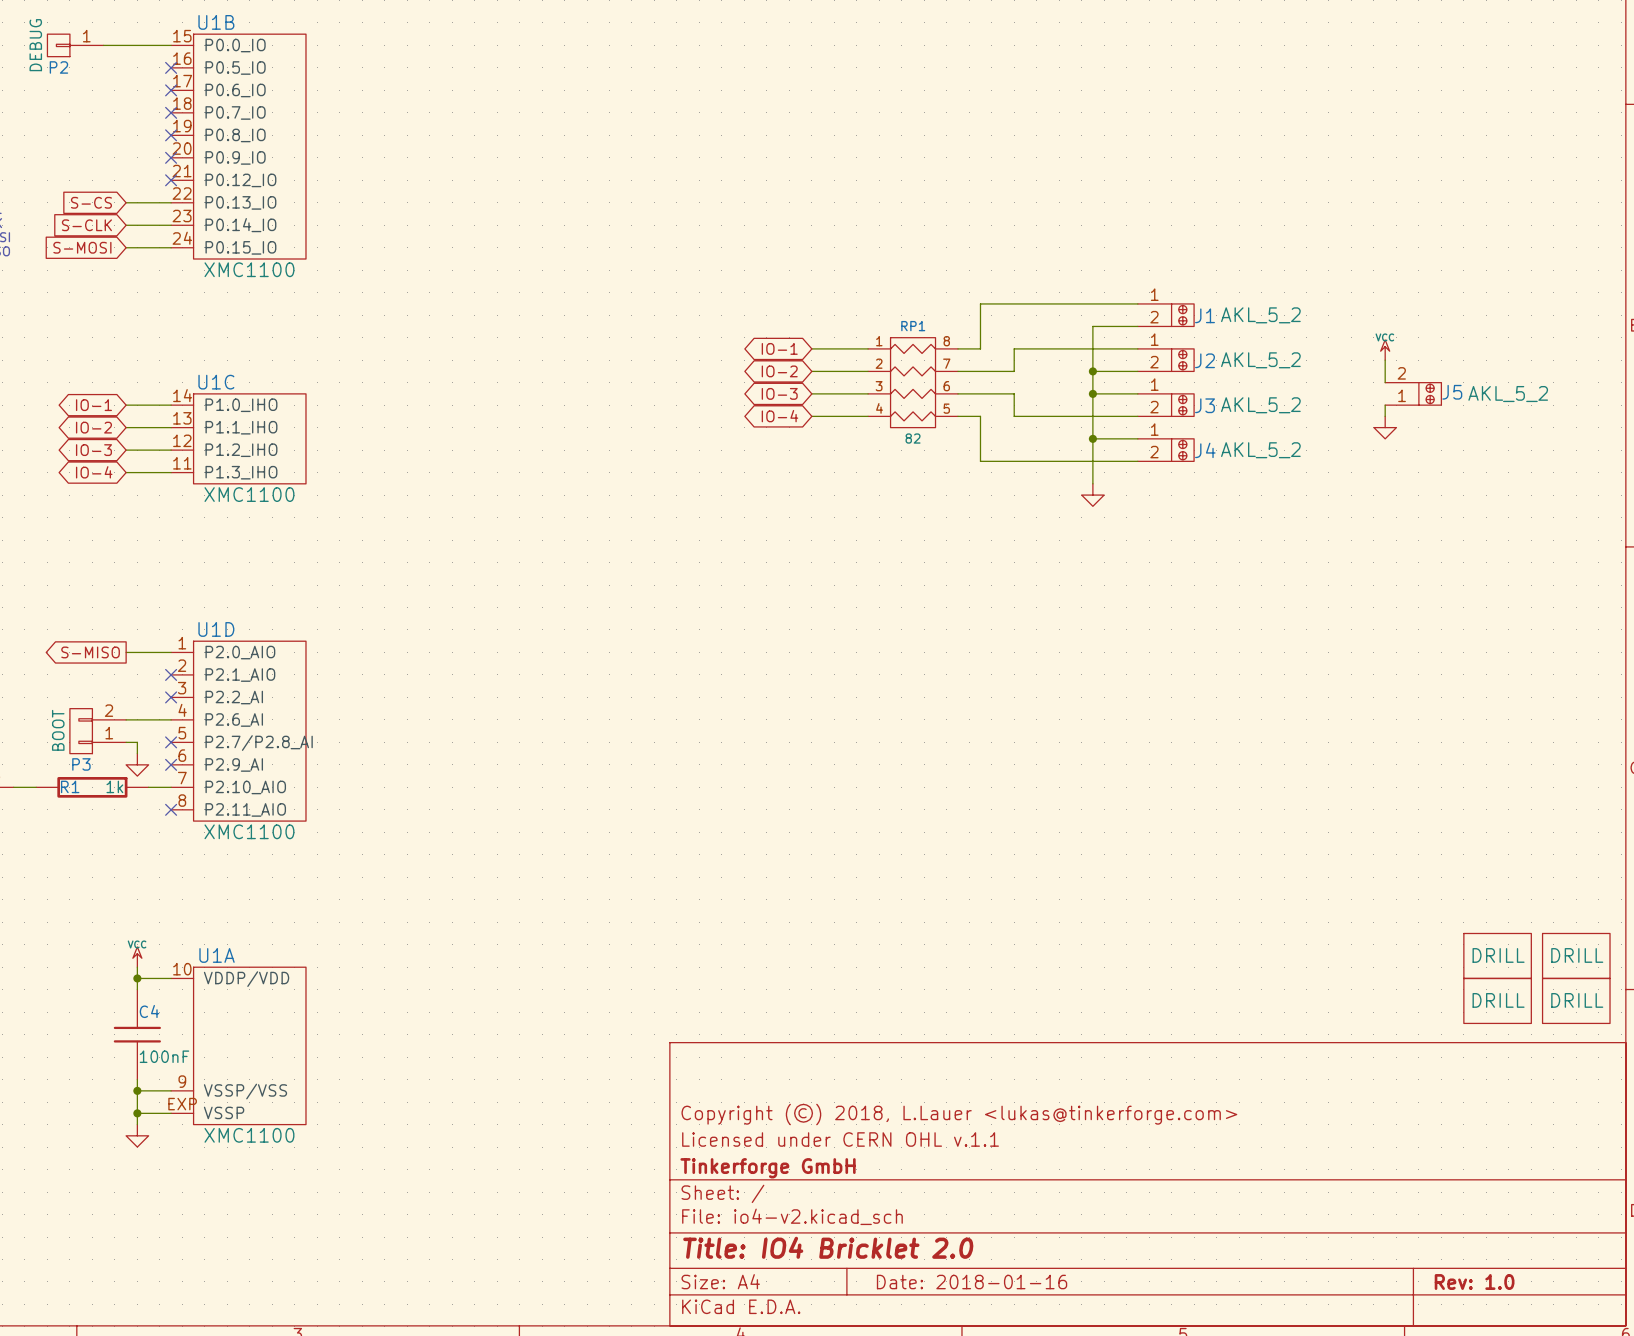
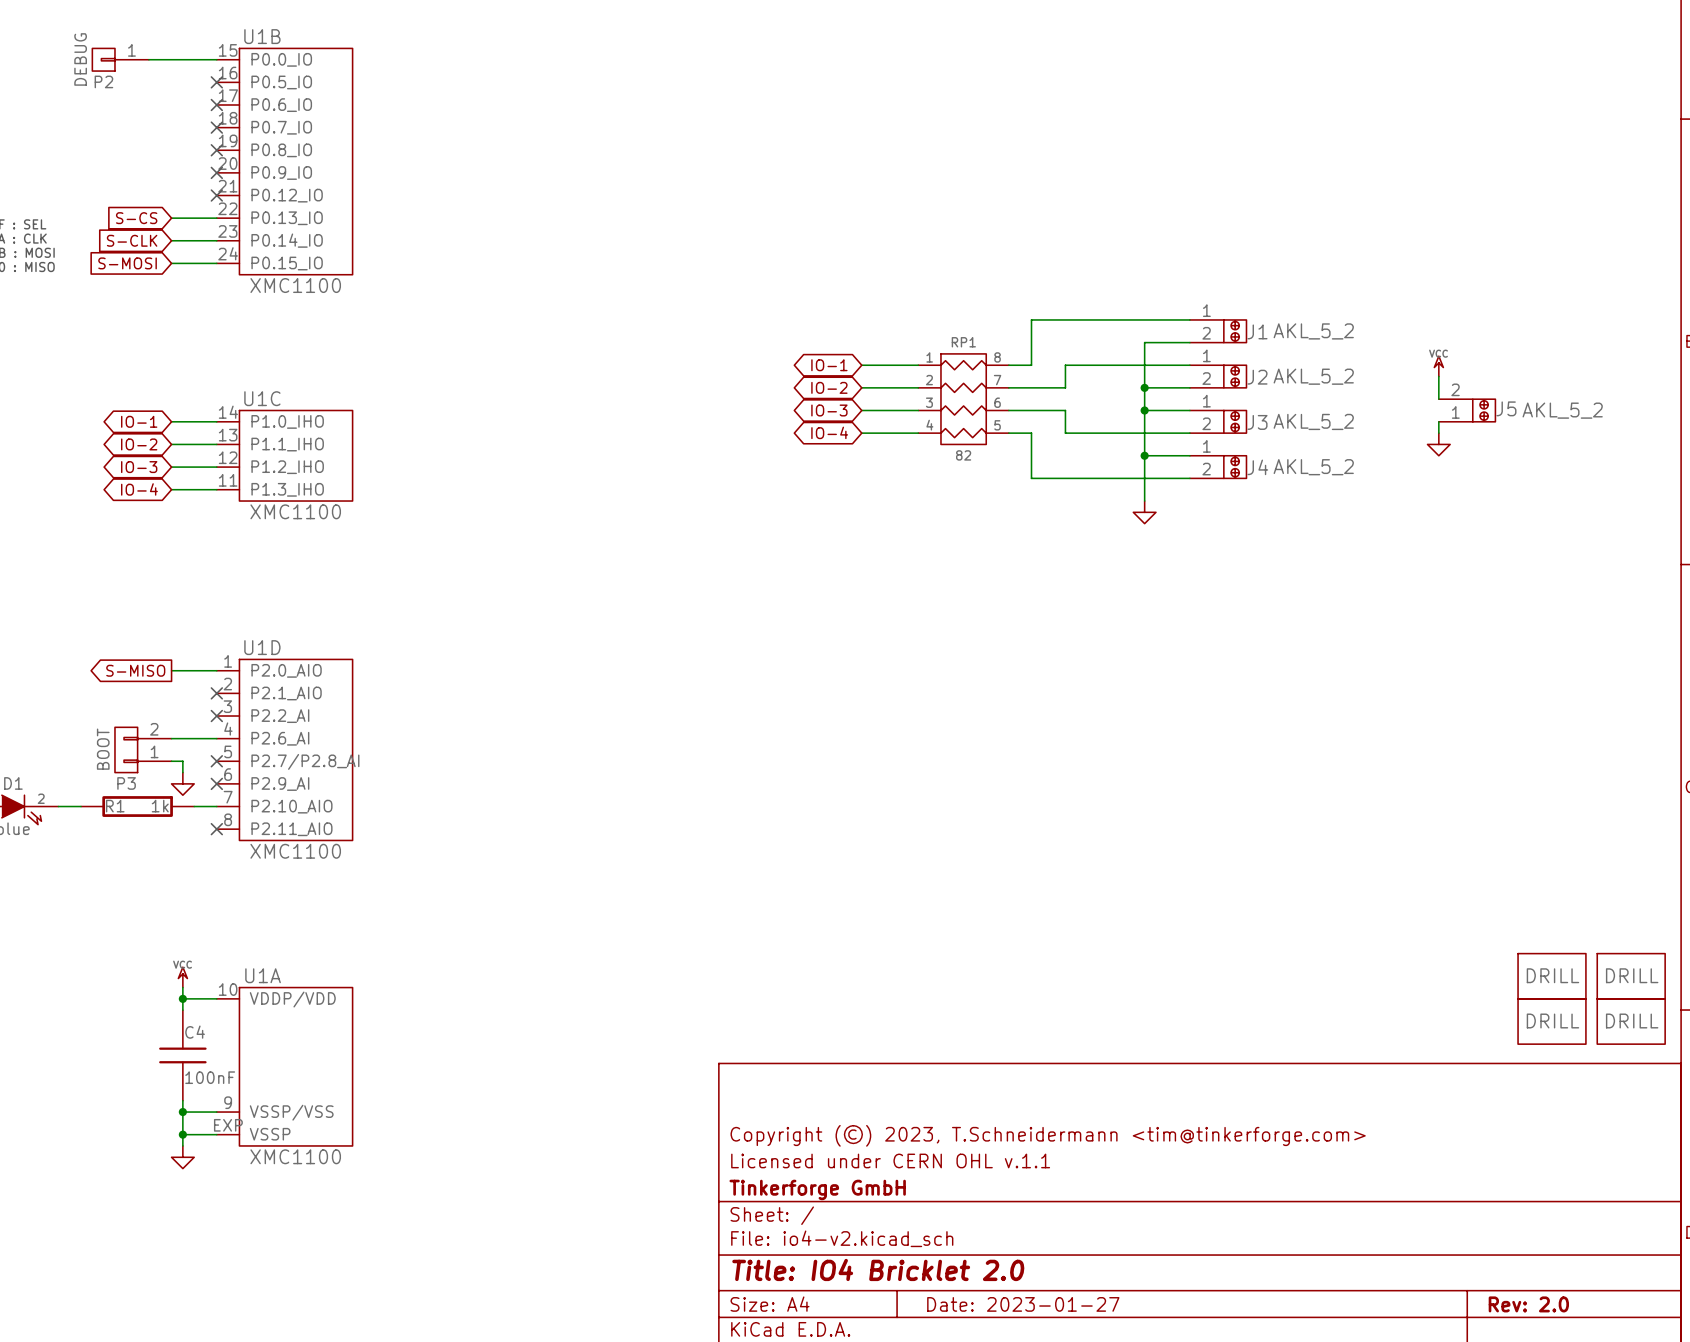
title block: Copyright (©) 2018, L.Lauer <lukas@tinkerforge.com> (959, 1114) -> Copyright (©) 2023, T.Schneidermann <tim@tinkerforge.com> (1048, 1135)
title block: Date: 2018-01-16 (972, 1282) -> Date: 2023-01-27 (1023, 1304)
title block: Rev: 1.0 (1474, 1282) -> Rev: 2.0 (1528, 1304)

